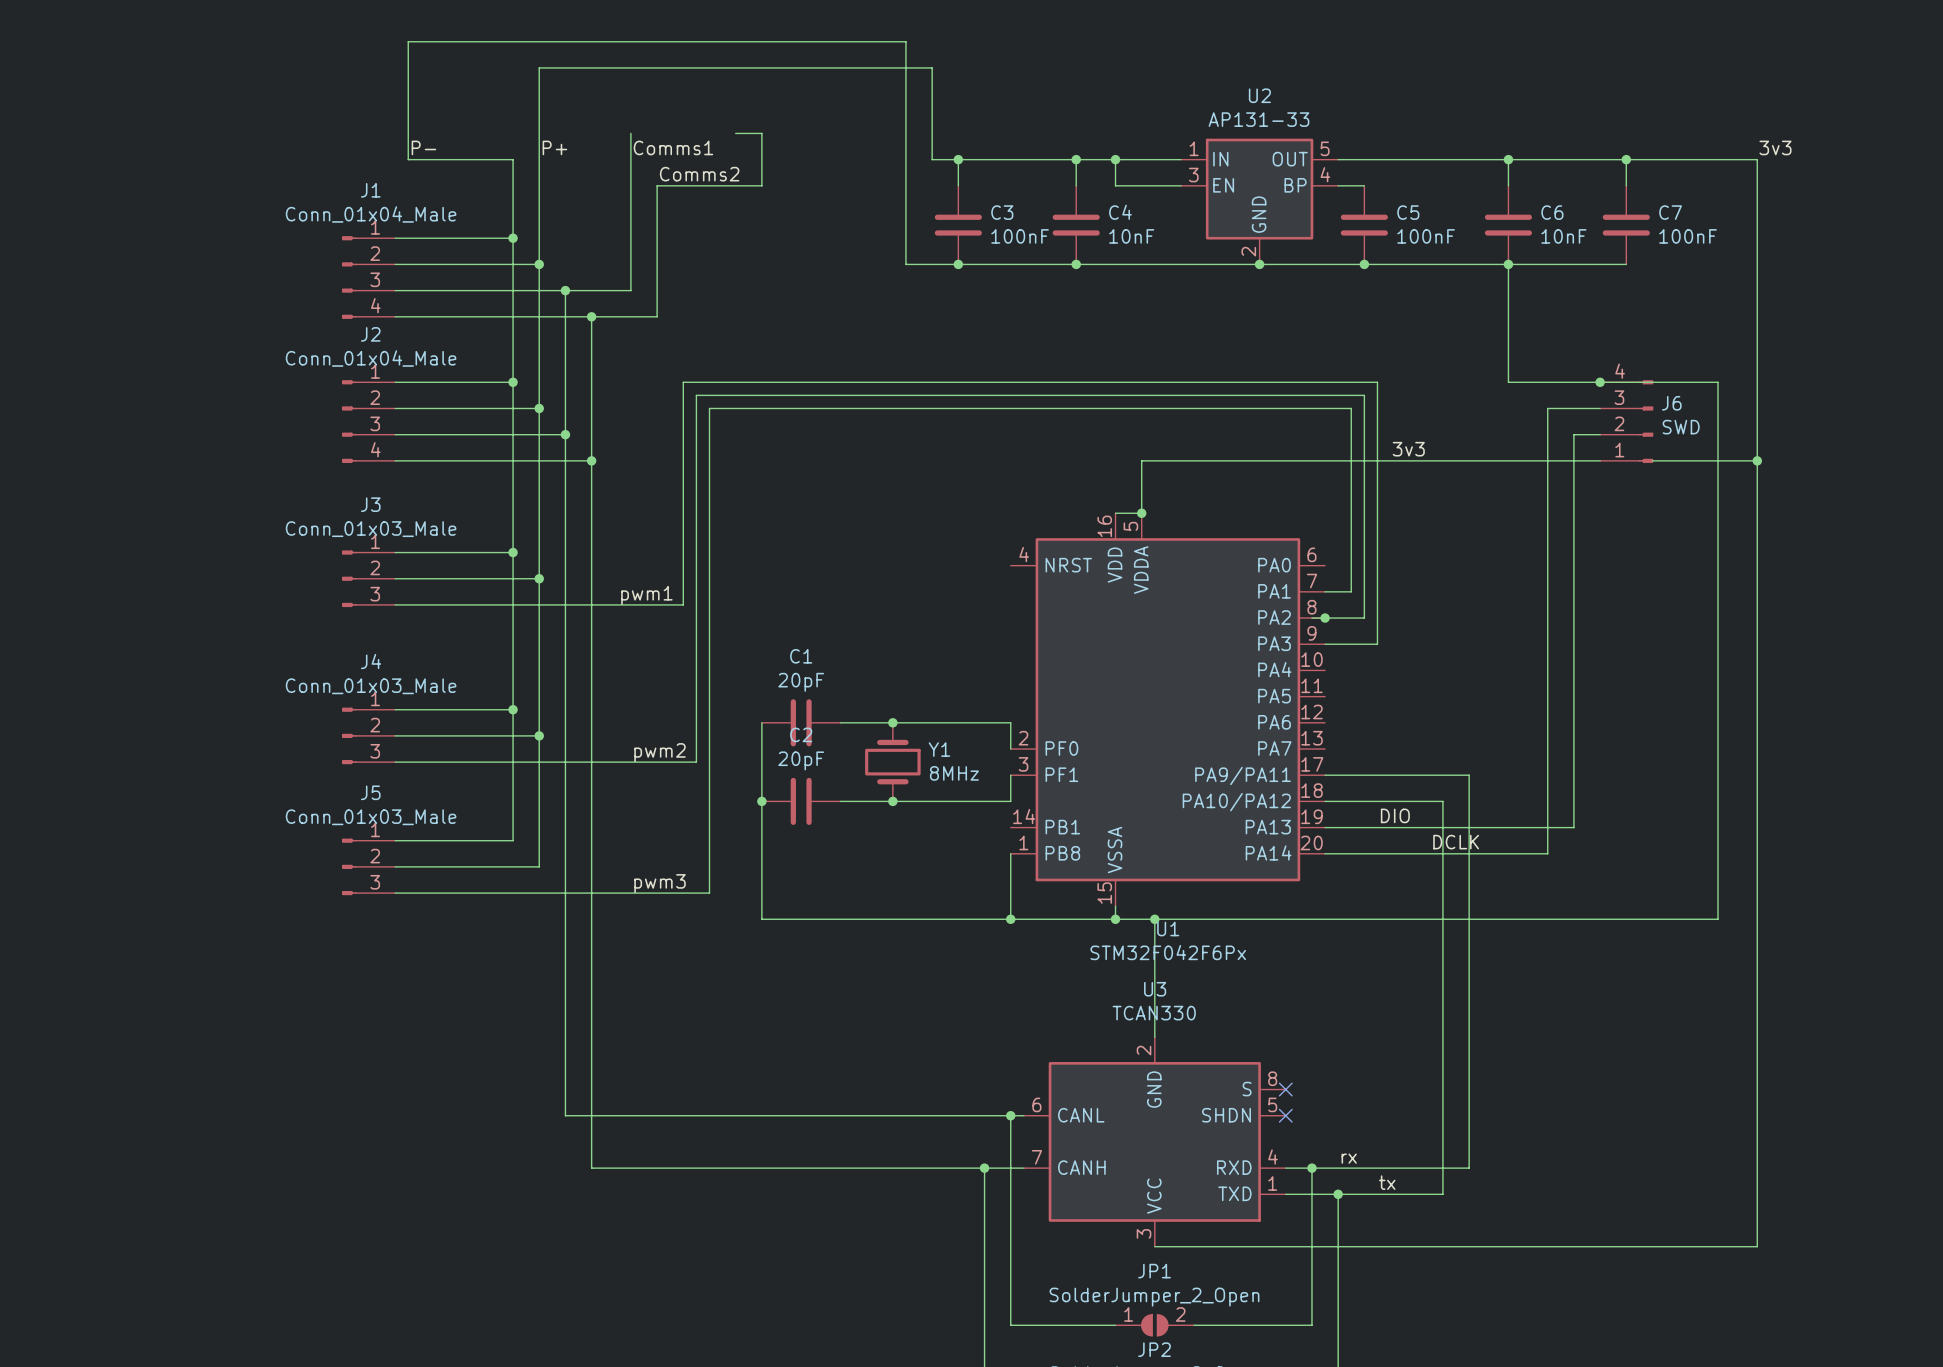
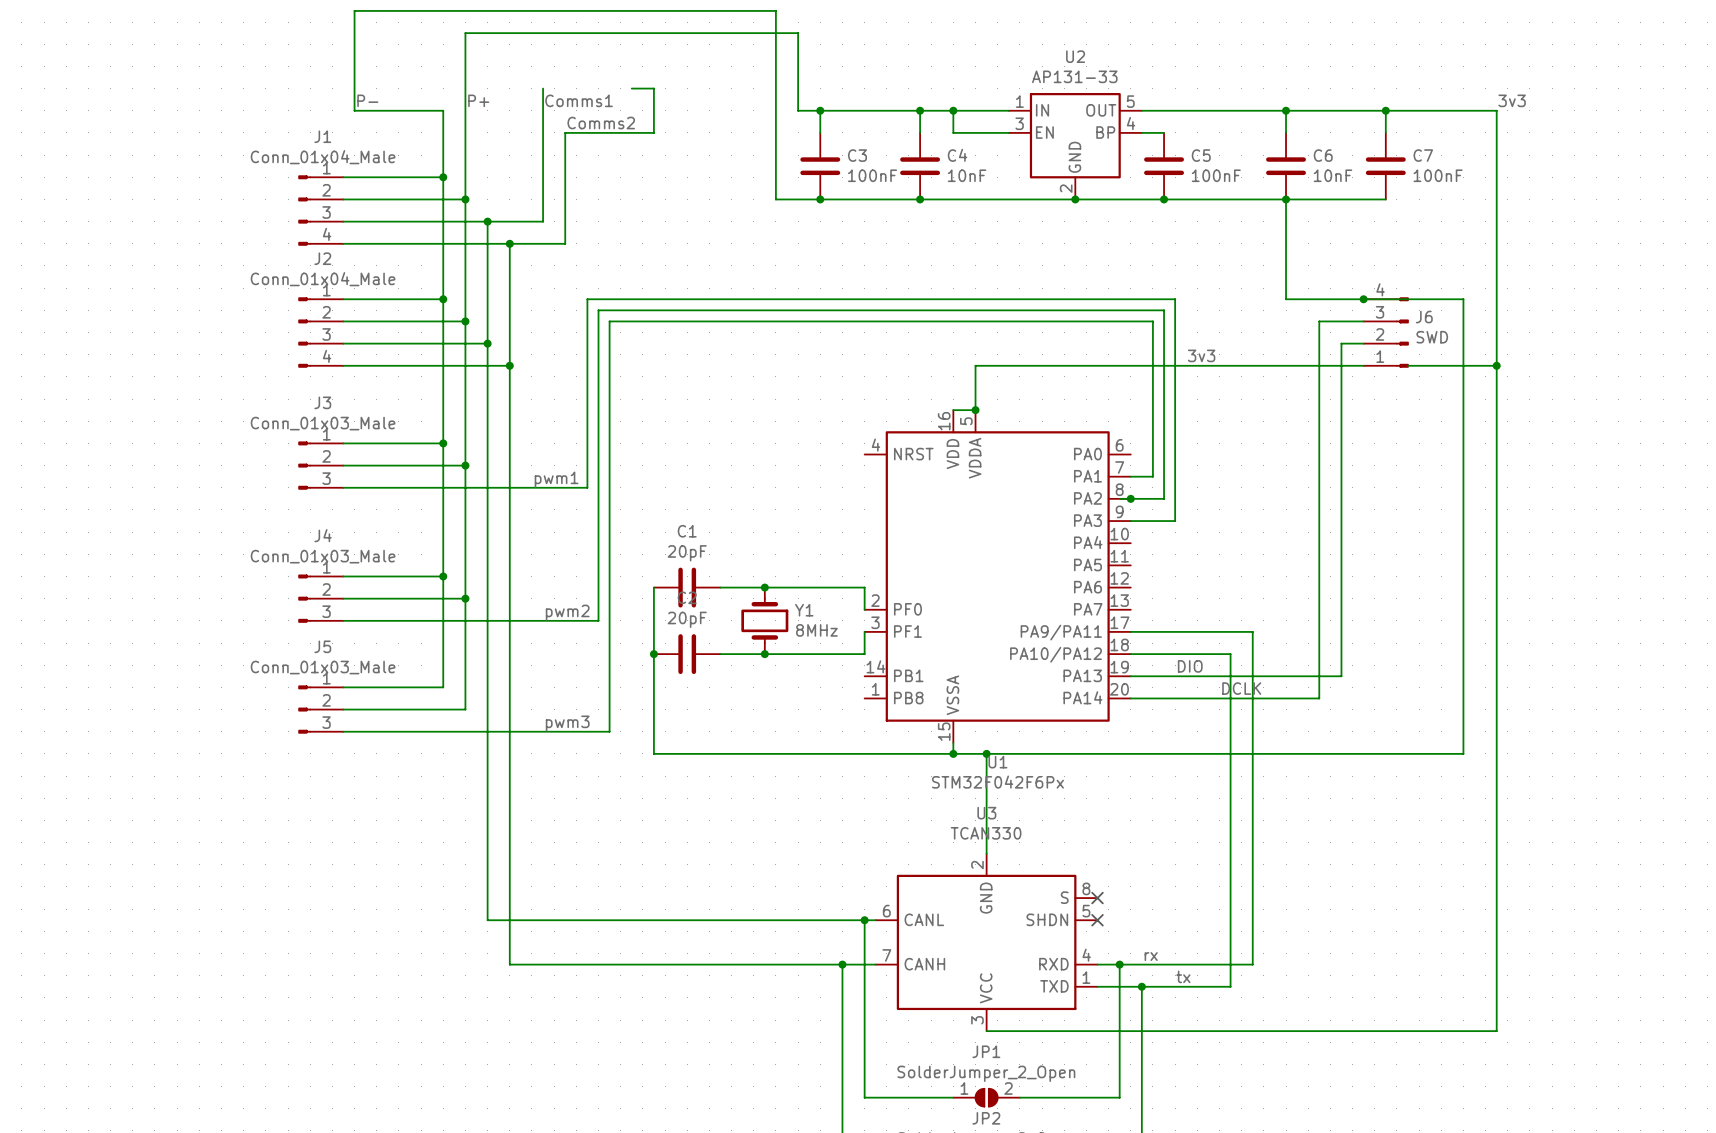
wire: (1010, 853) (1010, 919) -> none
junction: (1010, 919) -> none

